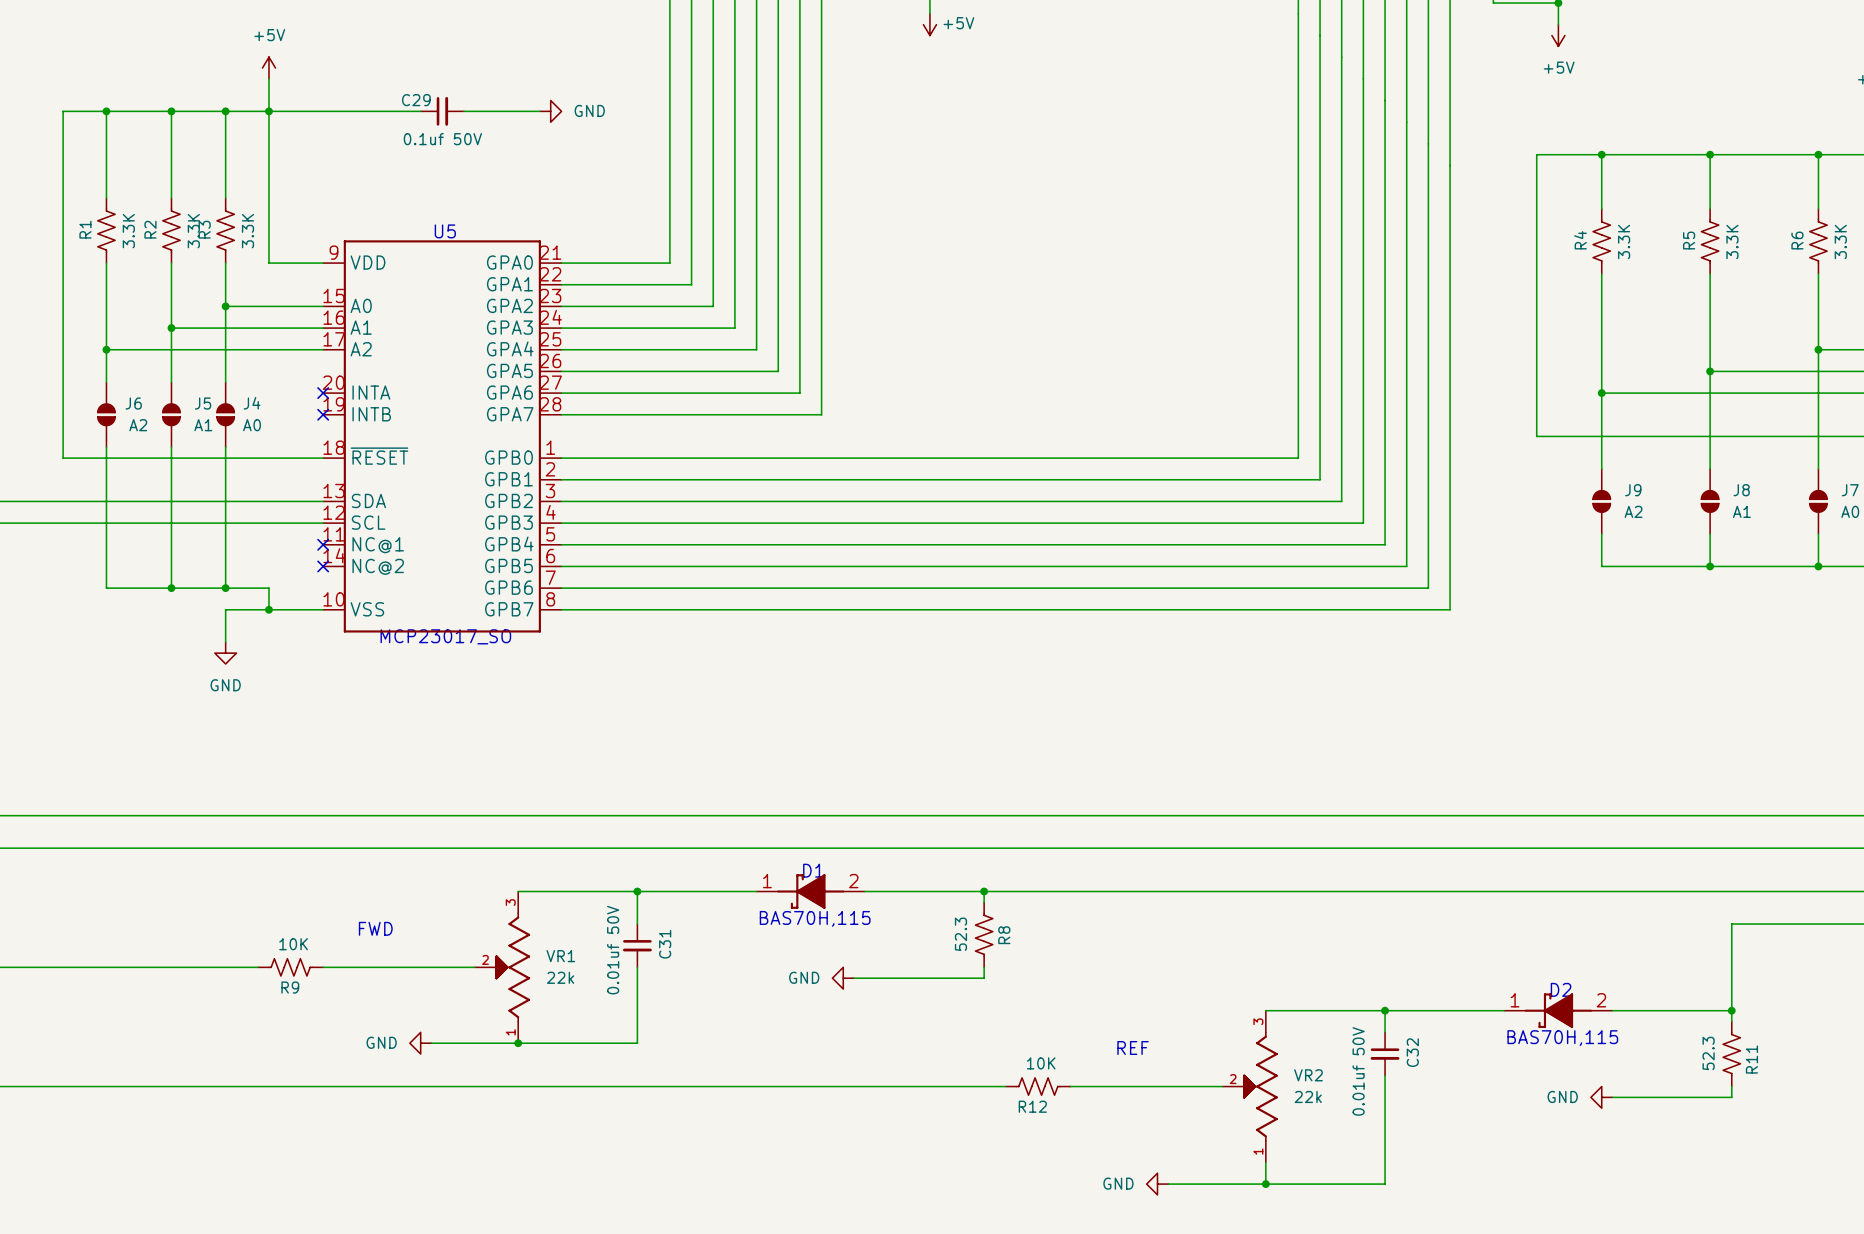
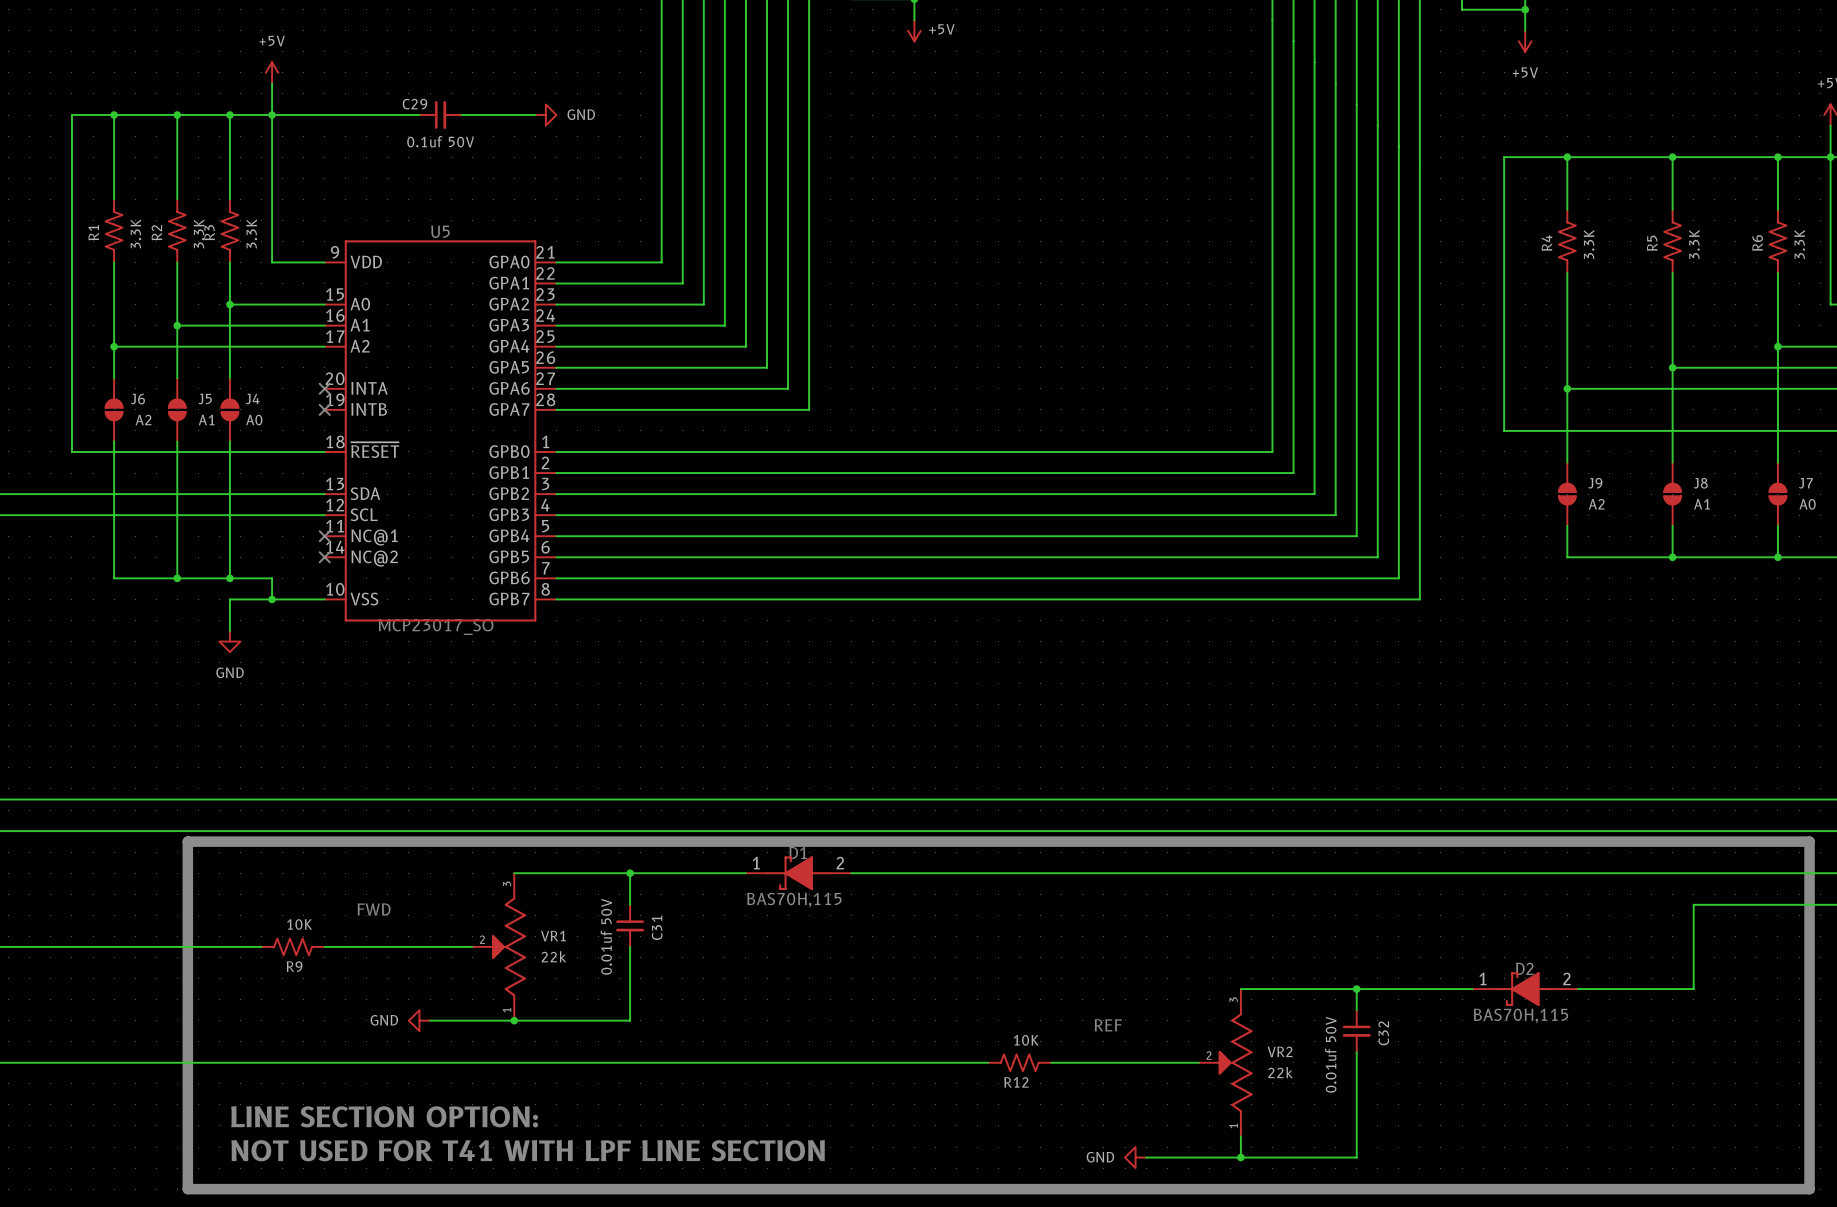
line: none -> (187, 841) (1809, 841) (1809, 1189) (187, 1189) (187, 841)
wire: (984, 891) (984, 902) -> none
junction: (984, 891) -> none
R8: 52.3 (984, 934) -> none
wire: (984, 967) (984, 978) (854, 978) -> none
power symbol: GND (843, 978) -> none
wire: (1731, 1010) (1731, 1021) -> none
junction: (1731, 1010) -> none
R11: 52.3 (1731, 1054) -> none
wire: (1731, 1086) (1731, 1097) (1612, 1097) -> none
power symbol: GND (1601, 1097) -> none
text: none -> LINE SECTION OPTION: (384, 1116)
text: none -> NOT USED FOR T41 WITH LPF LINE SECTION (528, 1150)

